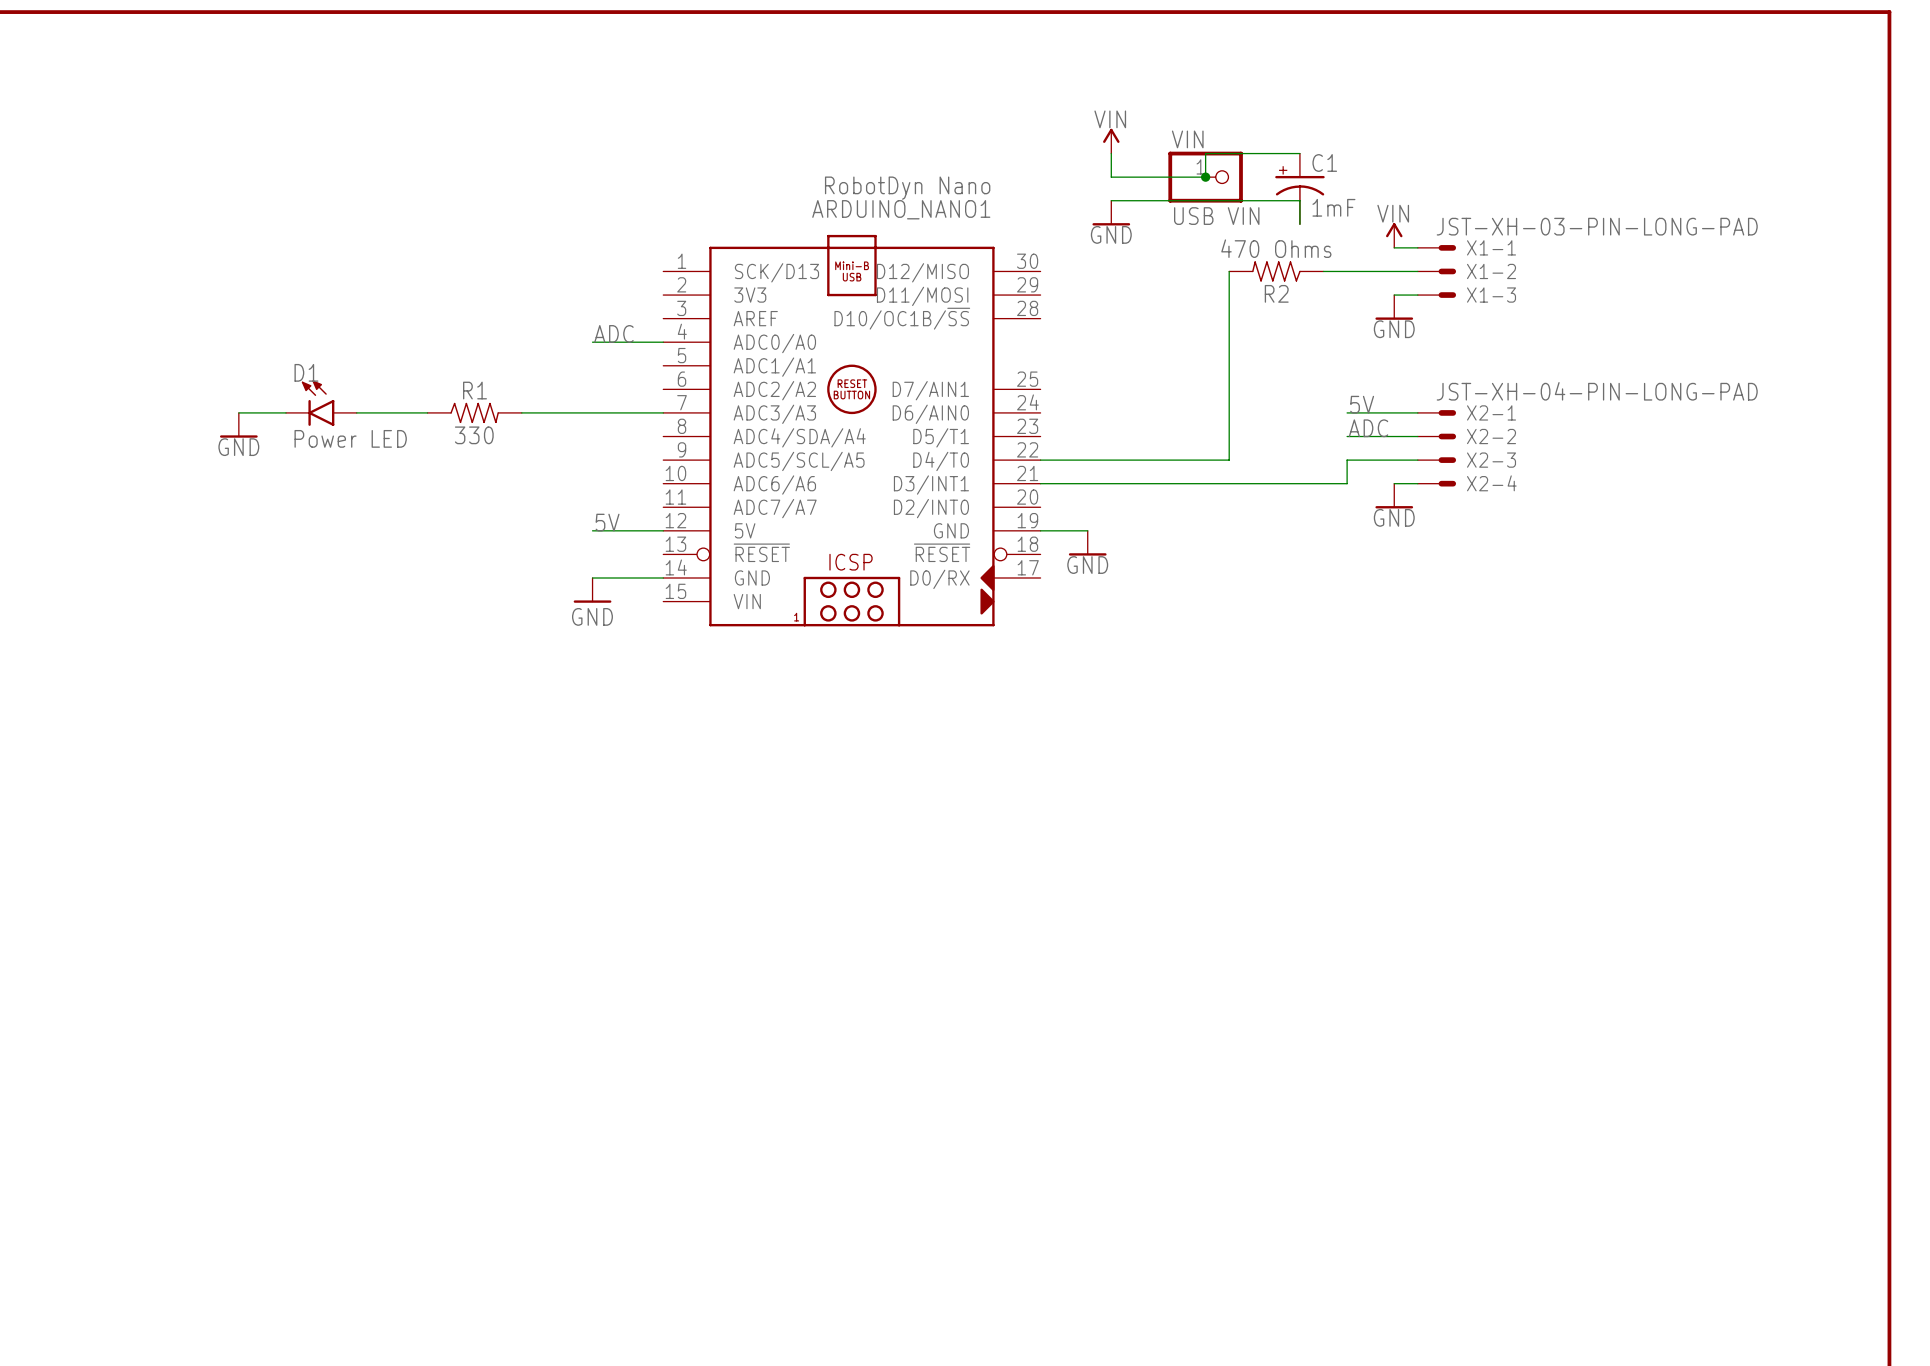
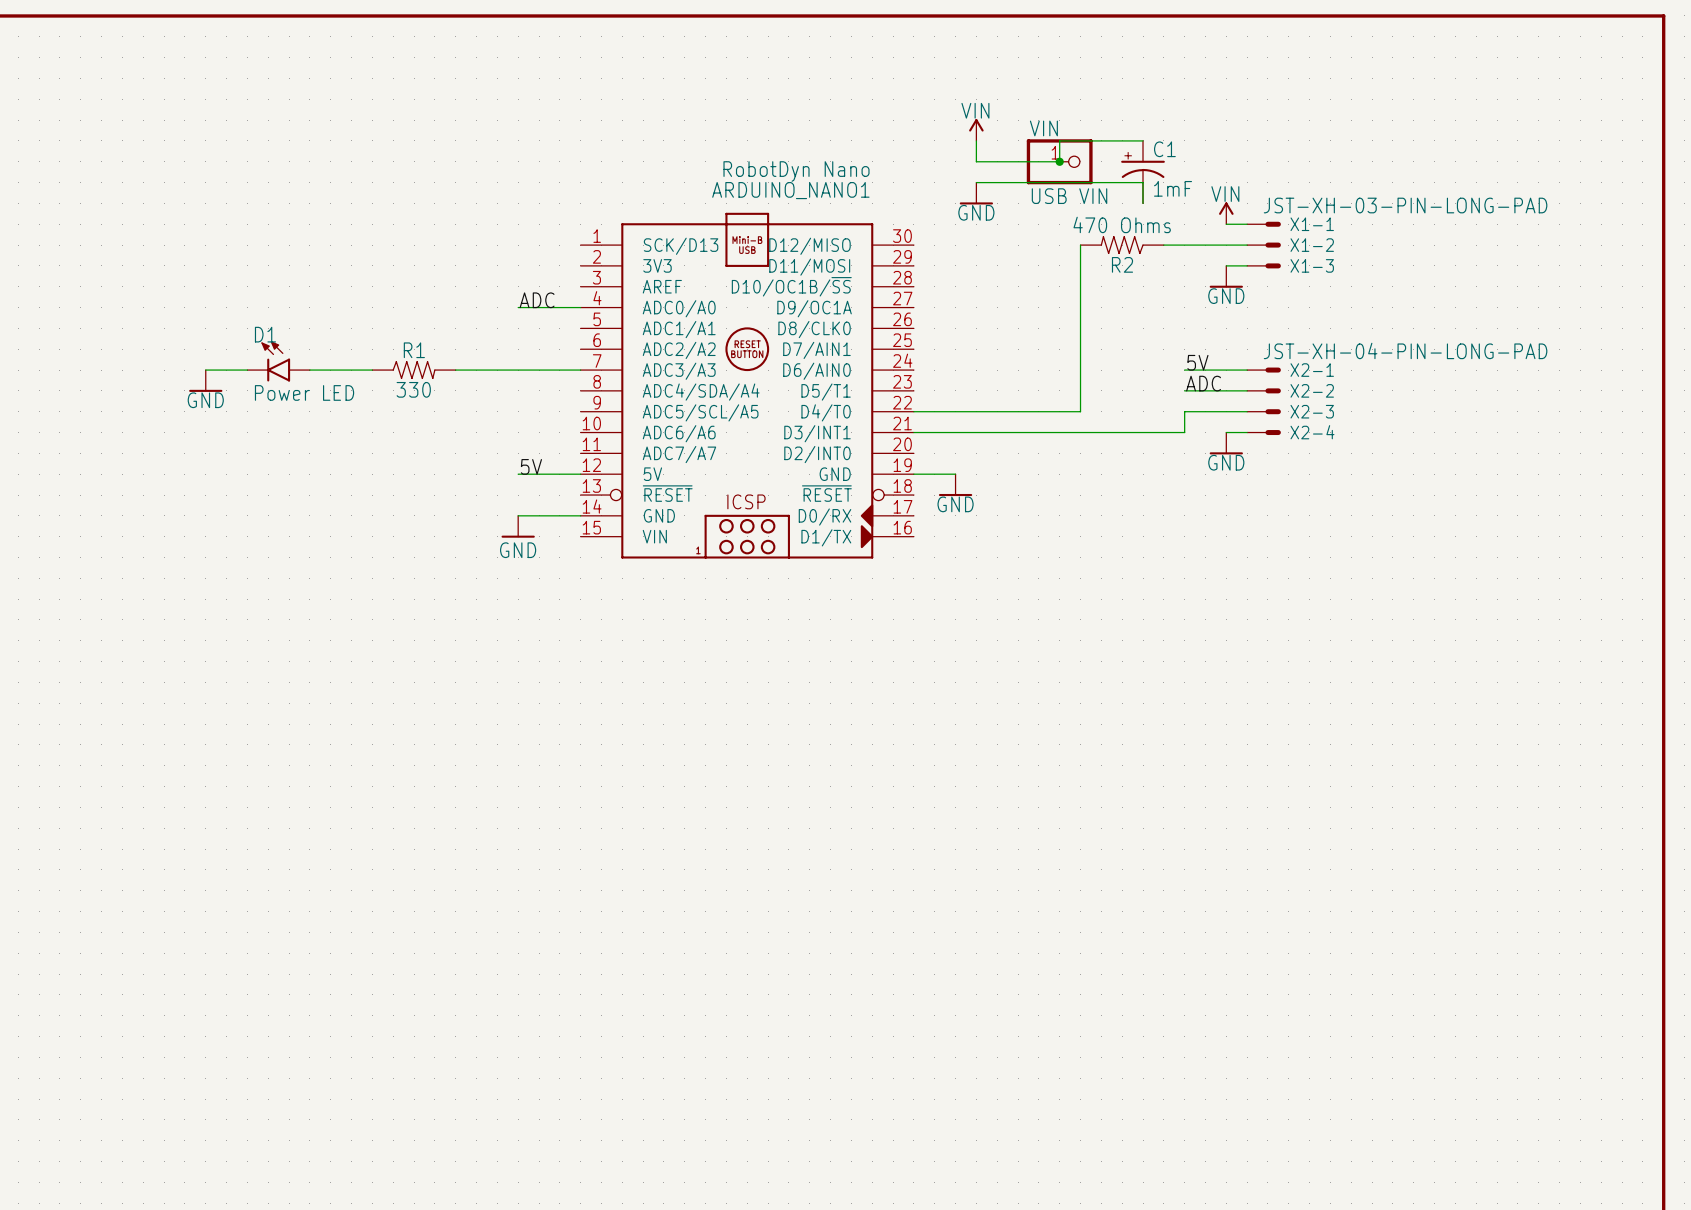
ARDUINO_NANO1 symbol: [663, 234, 1041, 627] -> [580, 212, 914, 559]

